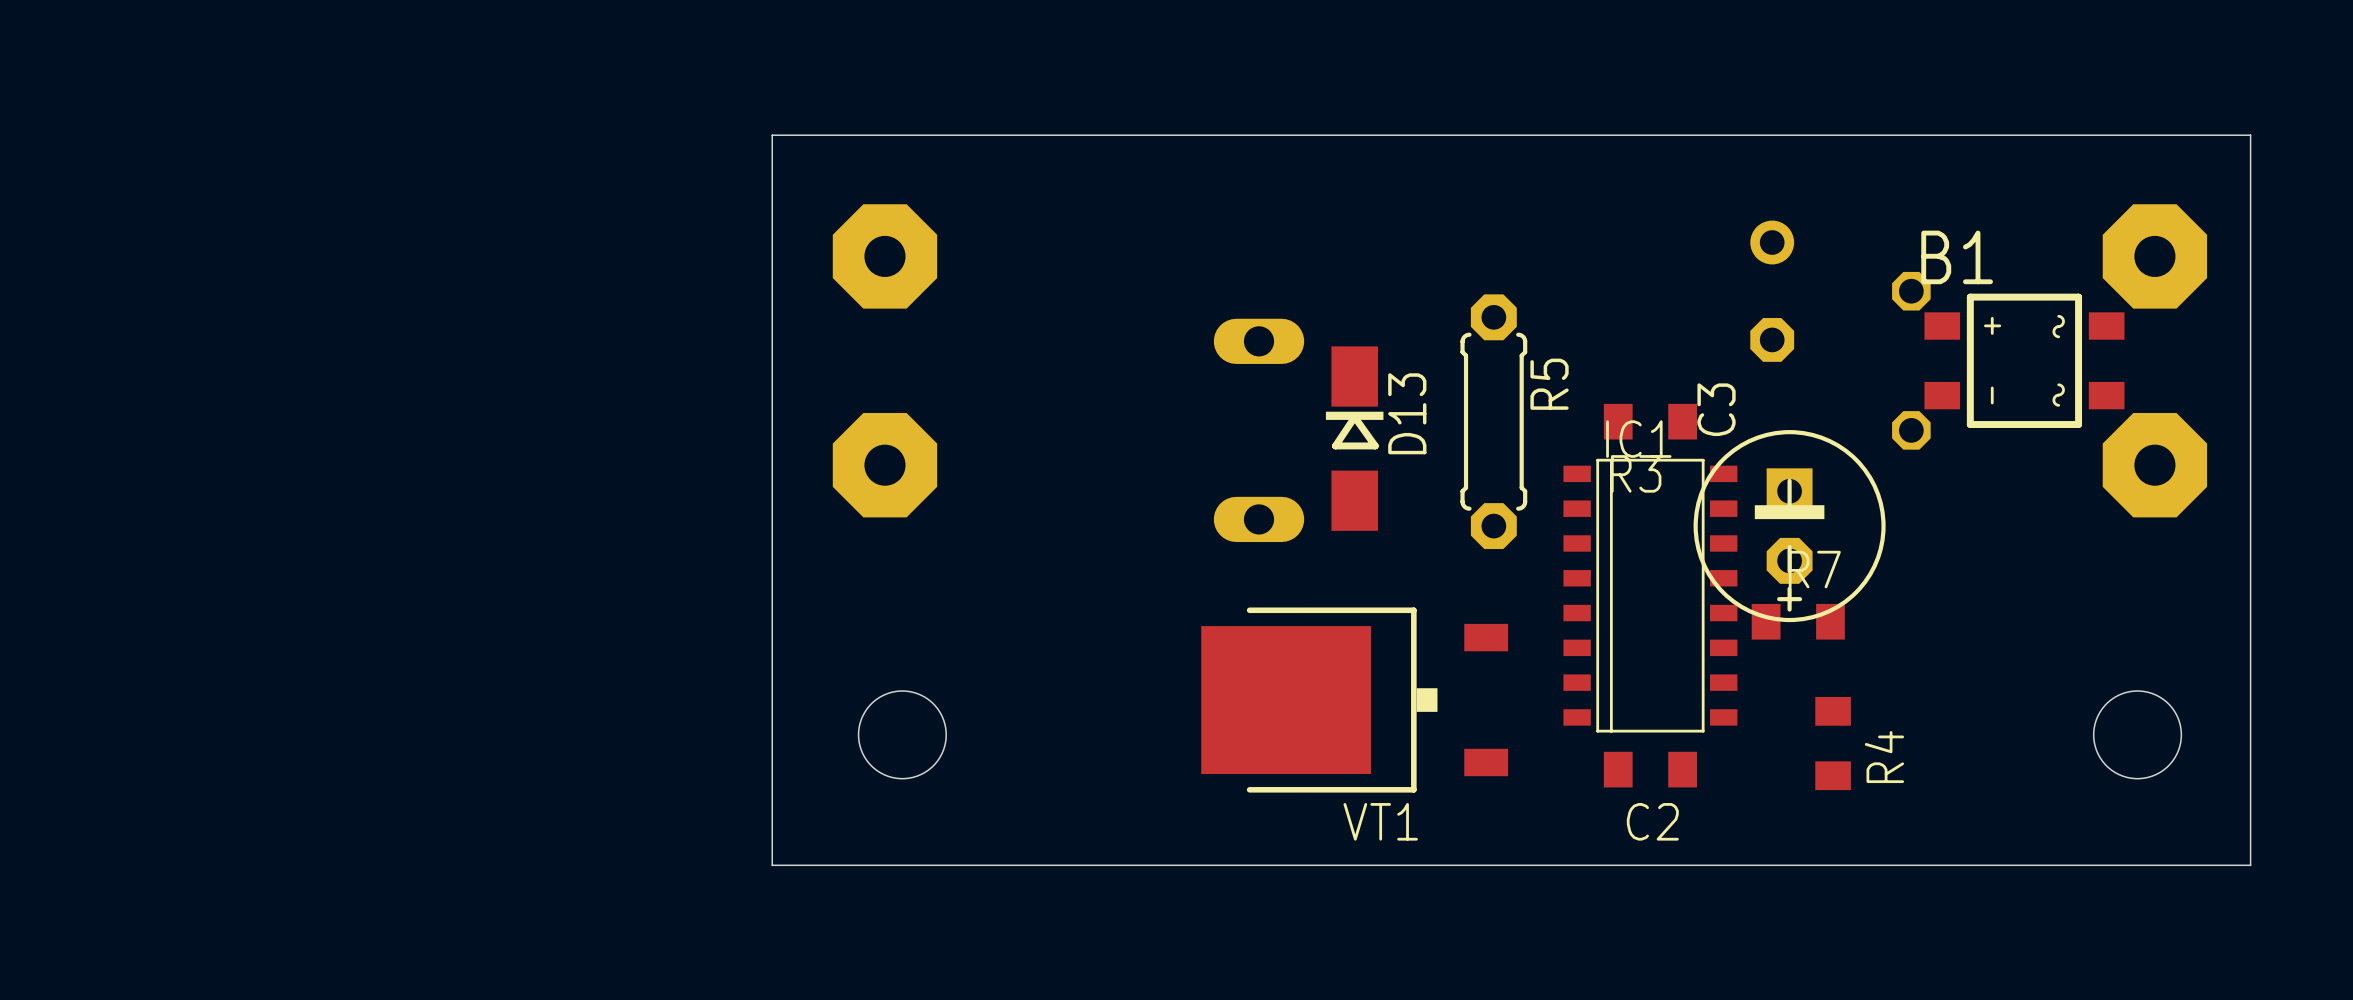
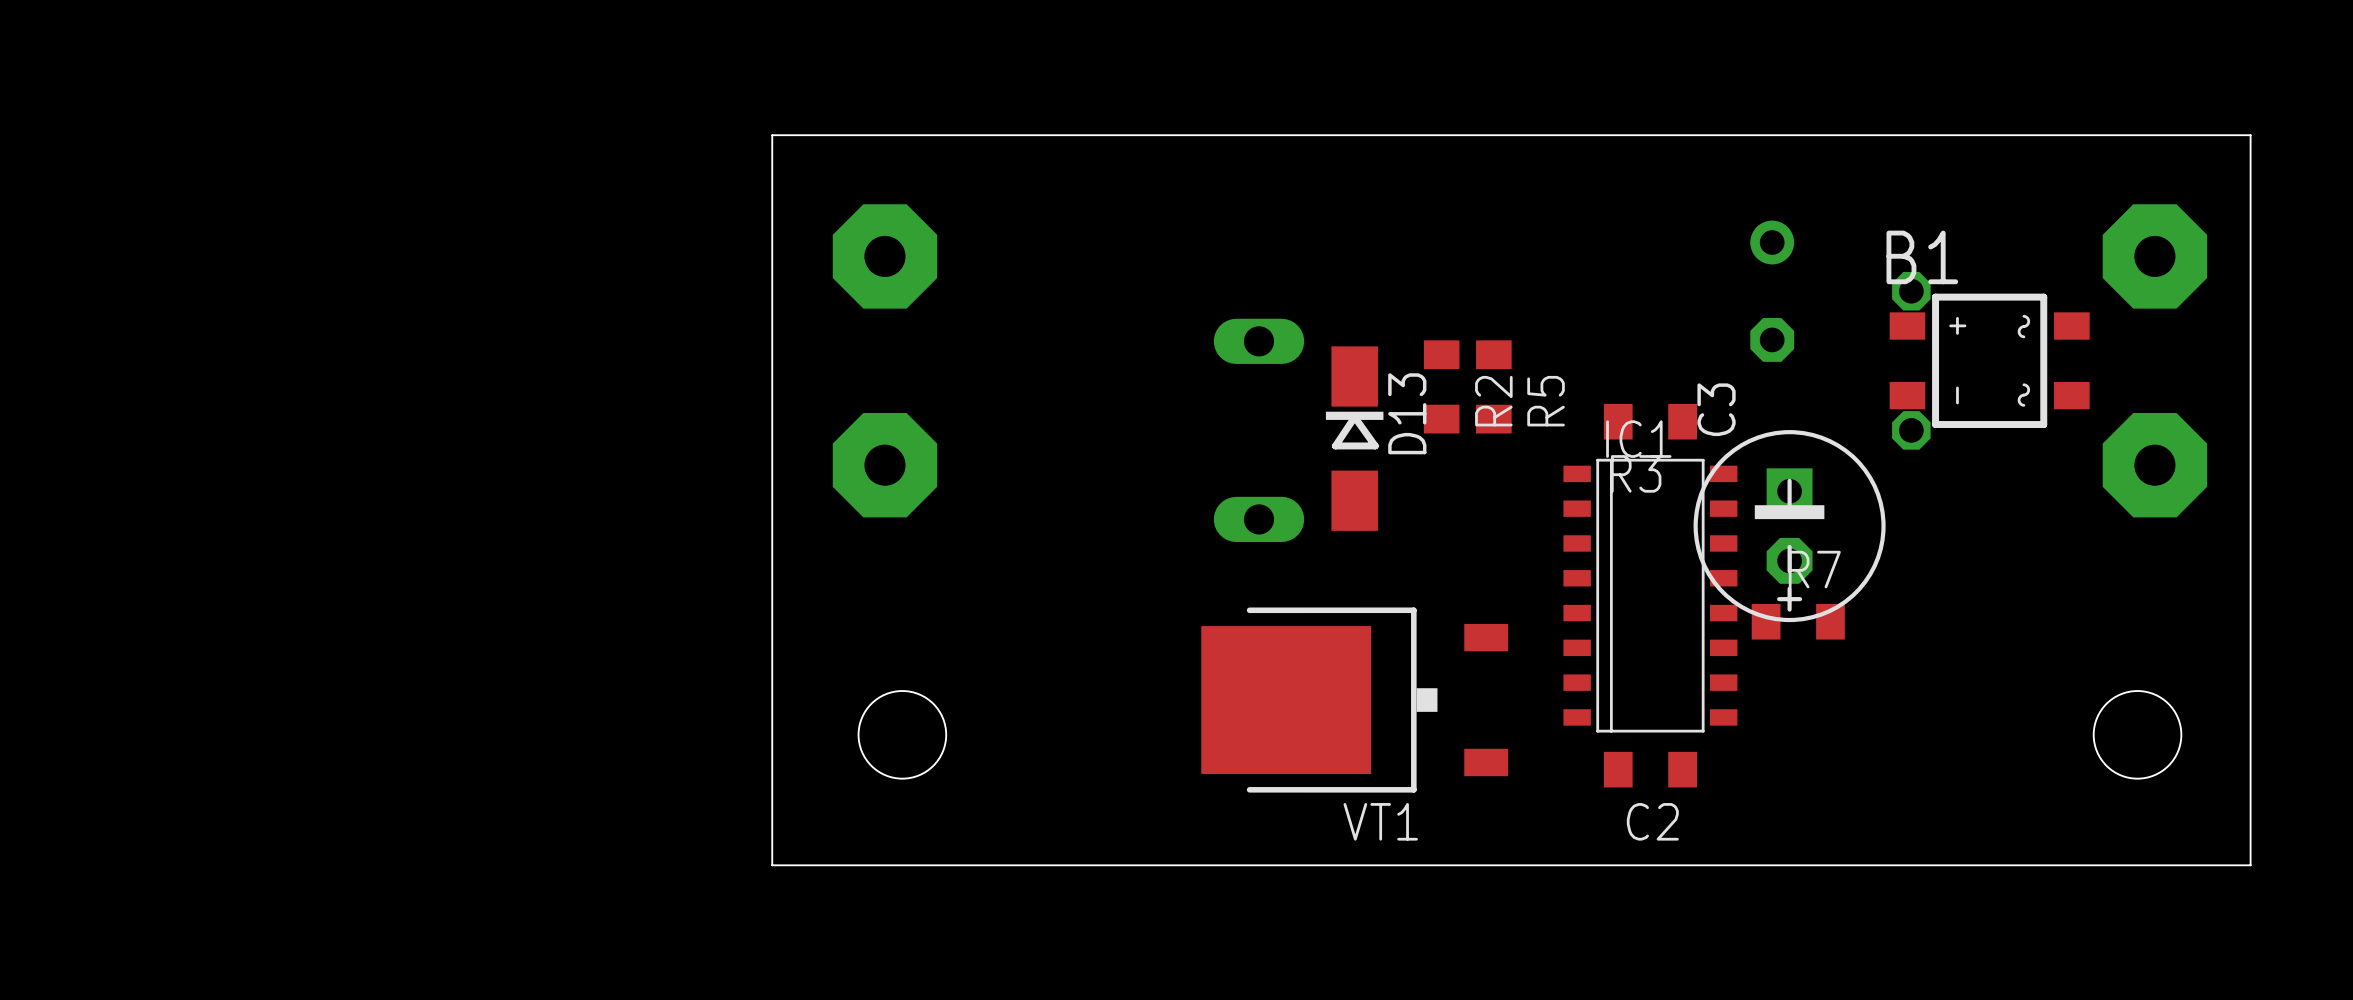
R5 footprint: [1460, 294, 1528, 550] -> [1476, 340, 1512, 434]
B1 position: (2024, 360) -> (1989, 360)
R2: none -> (1441, 386)
R4: (1833, 743) -> none

